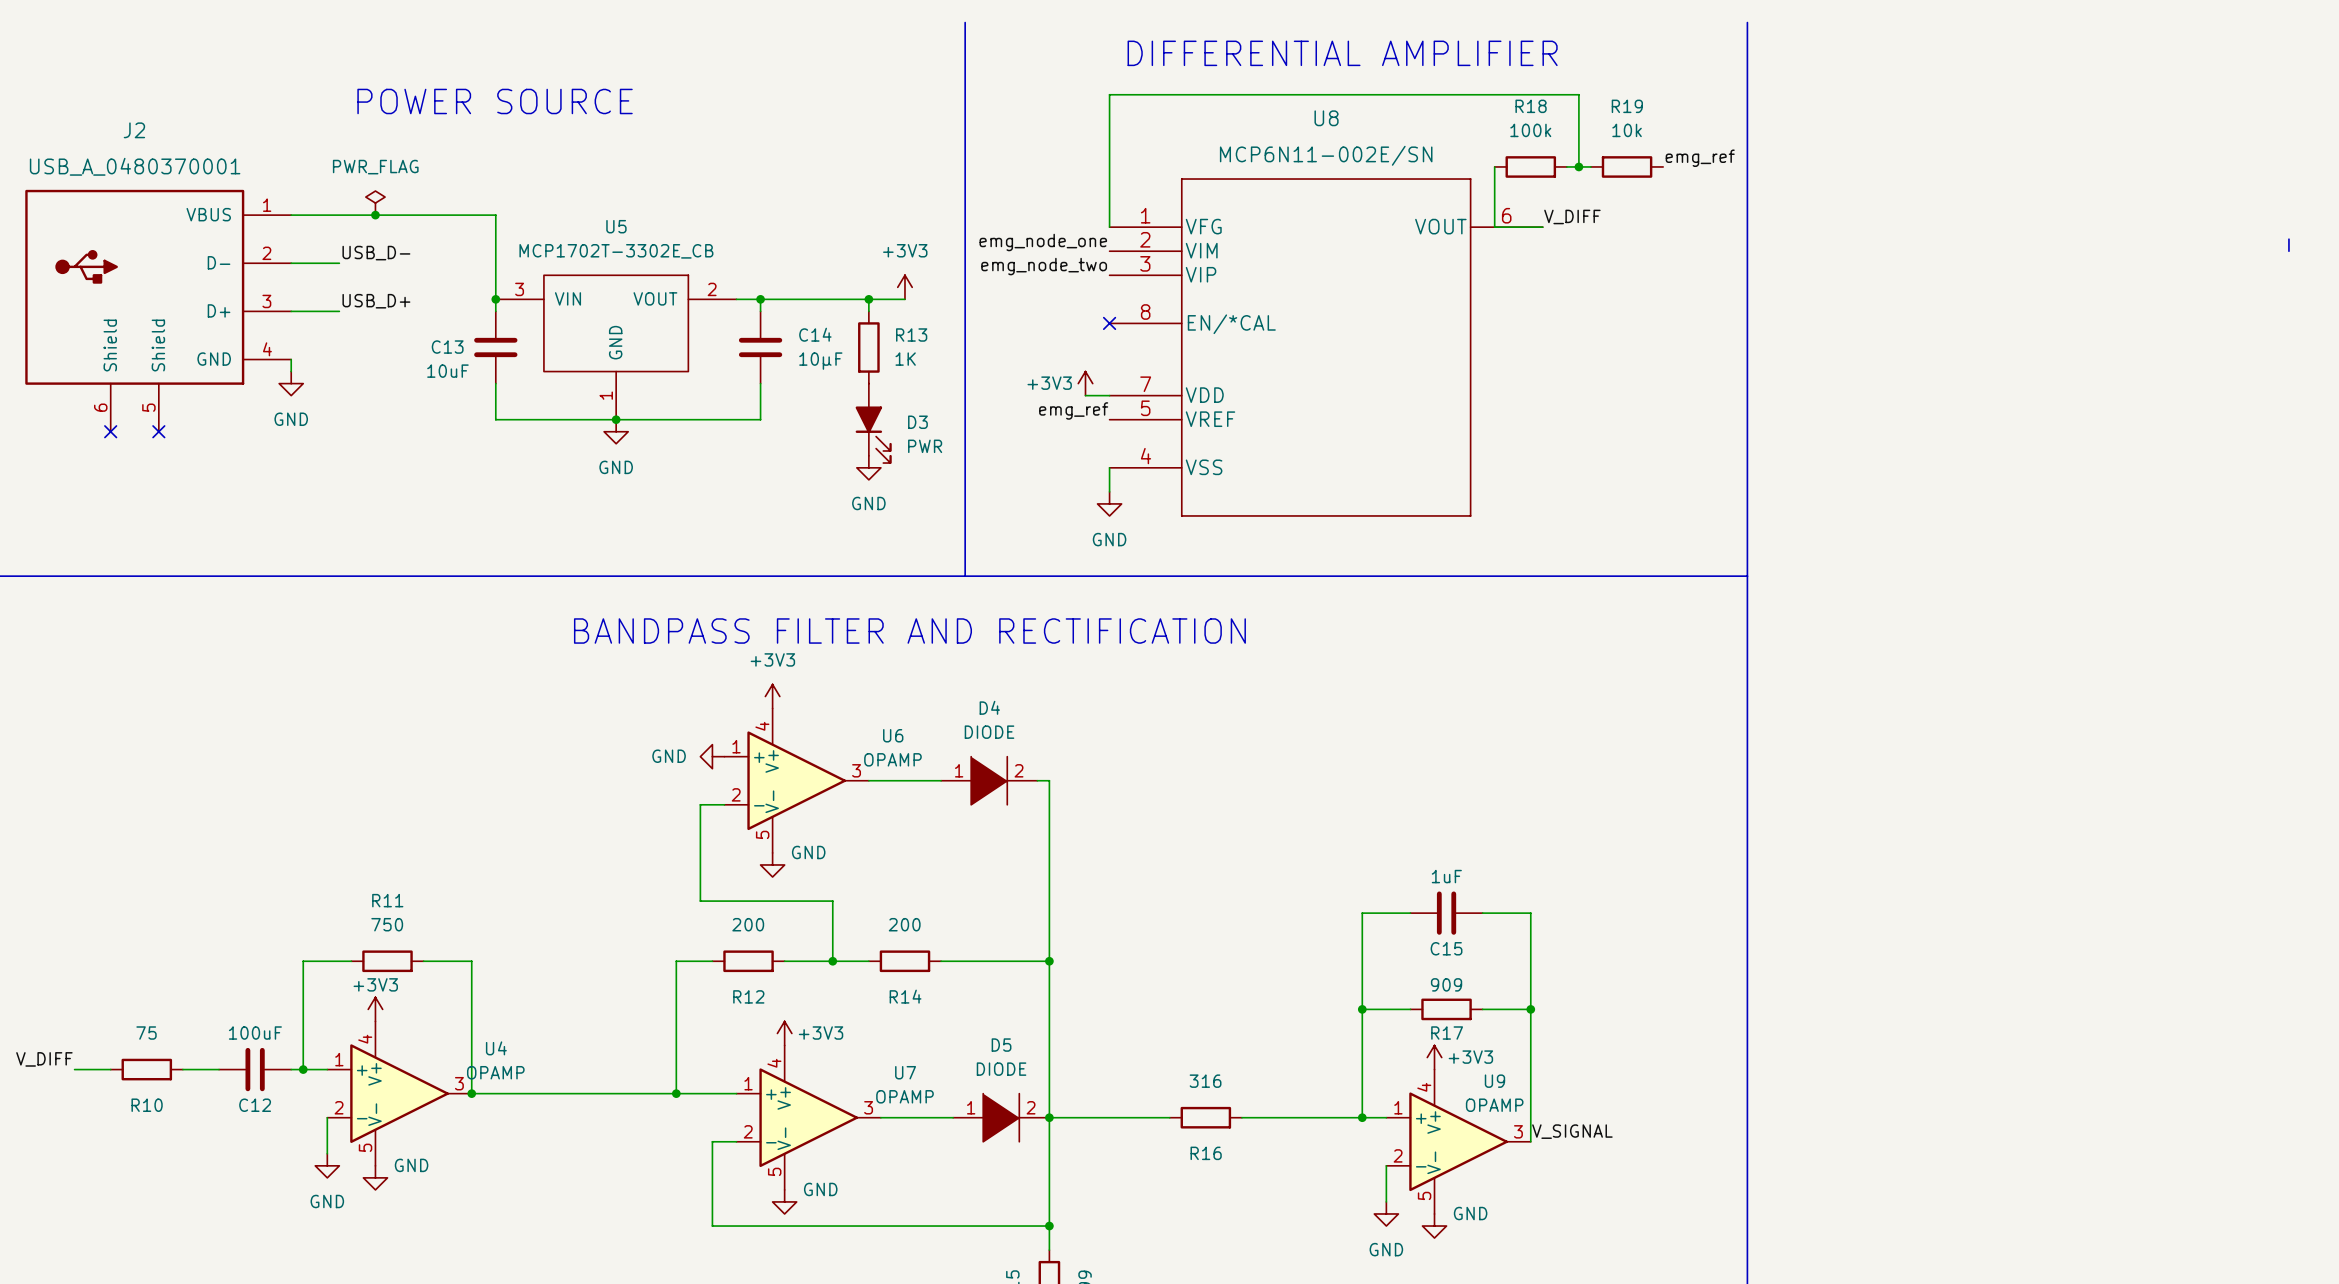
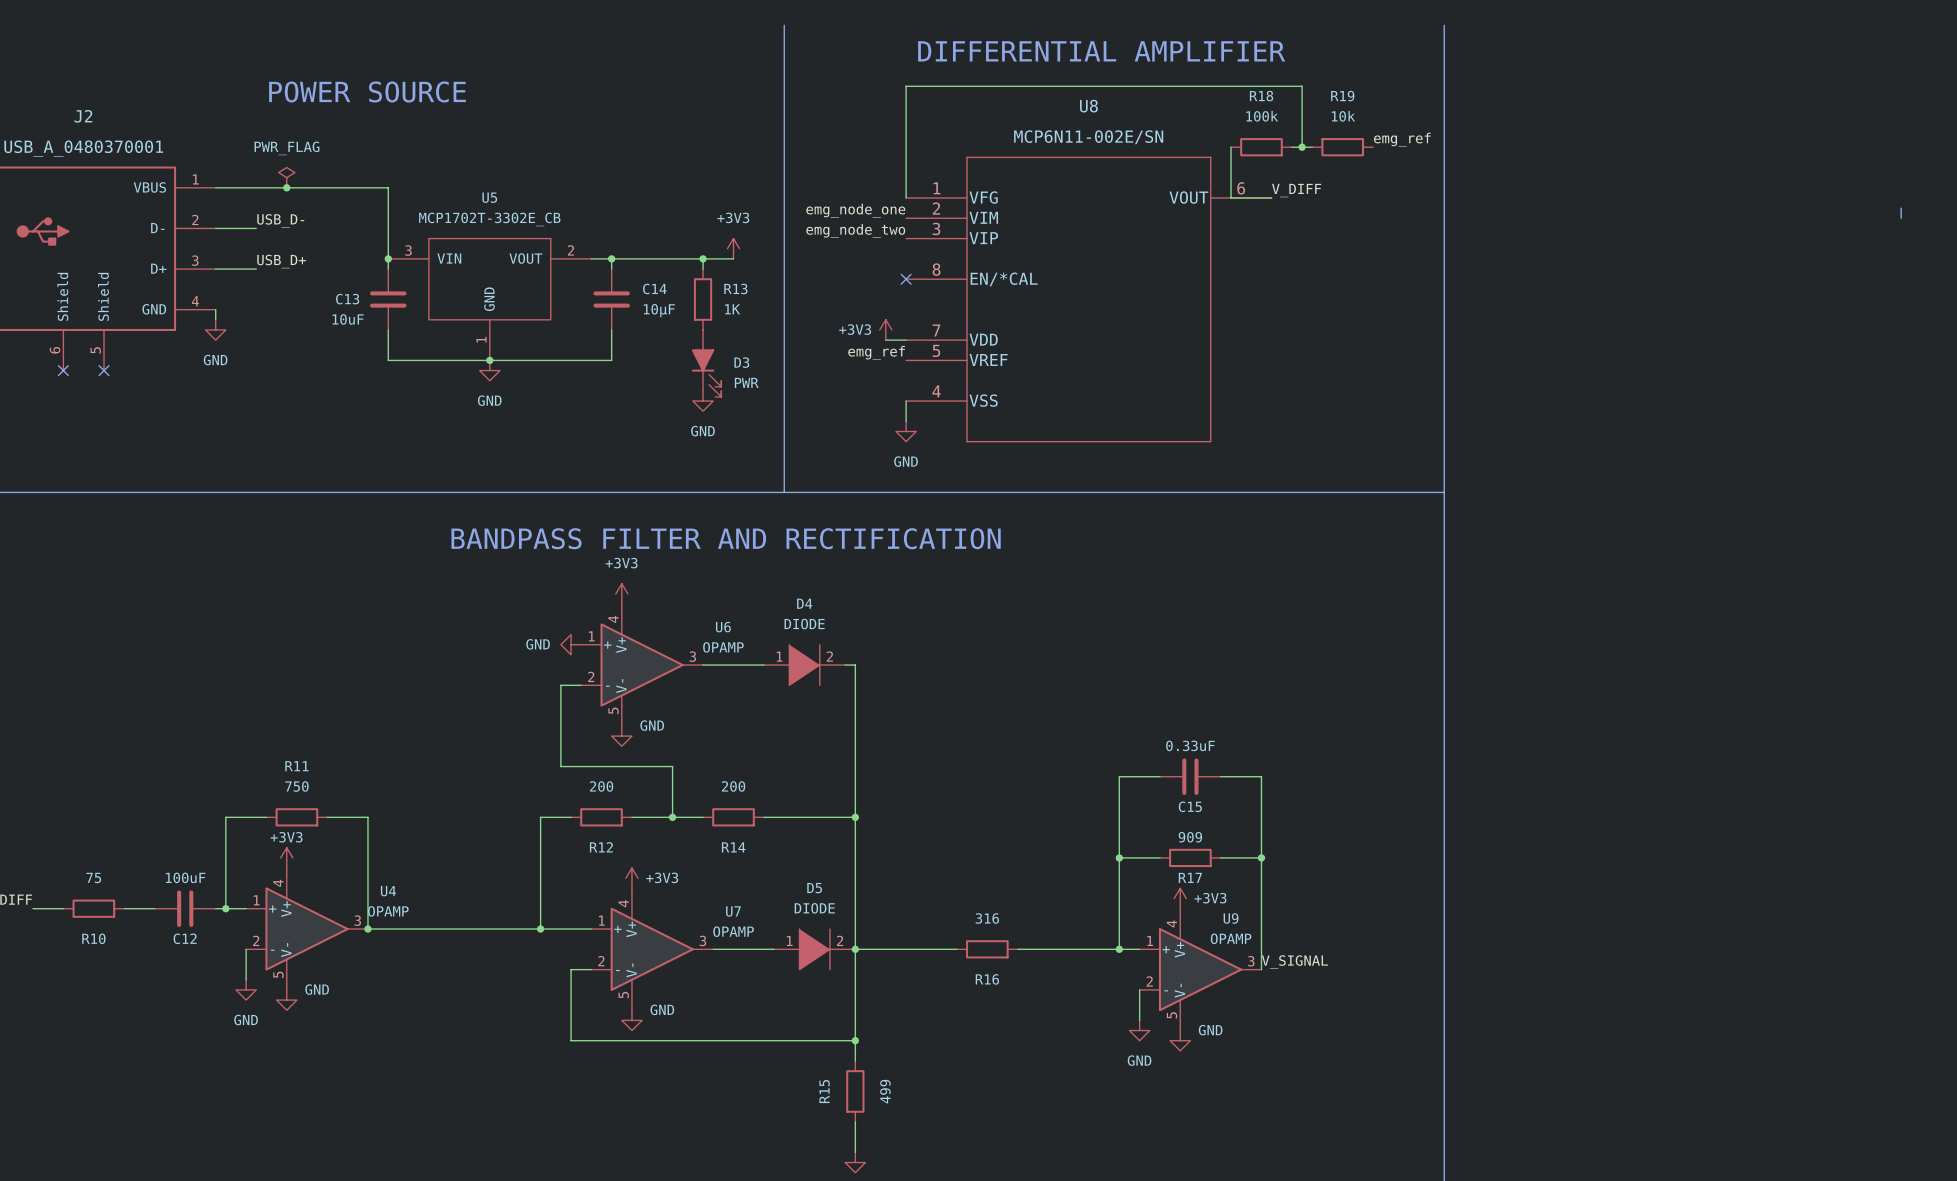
C15 value: 1uF (1446, 876) -> 0.33uF (1190, 745)

